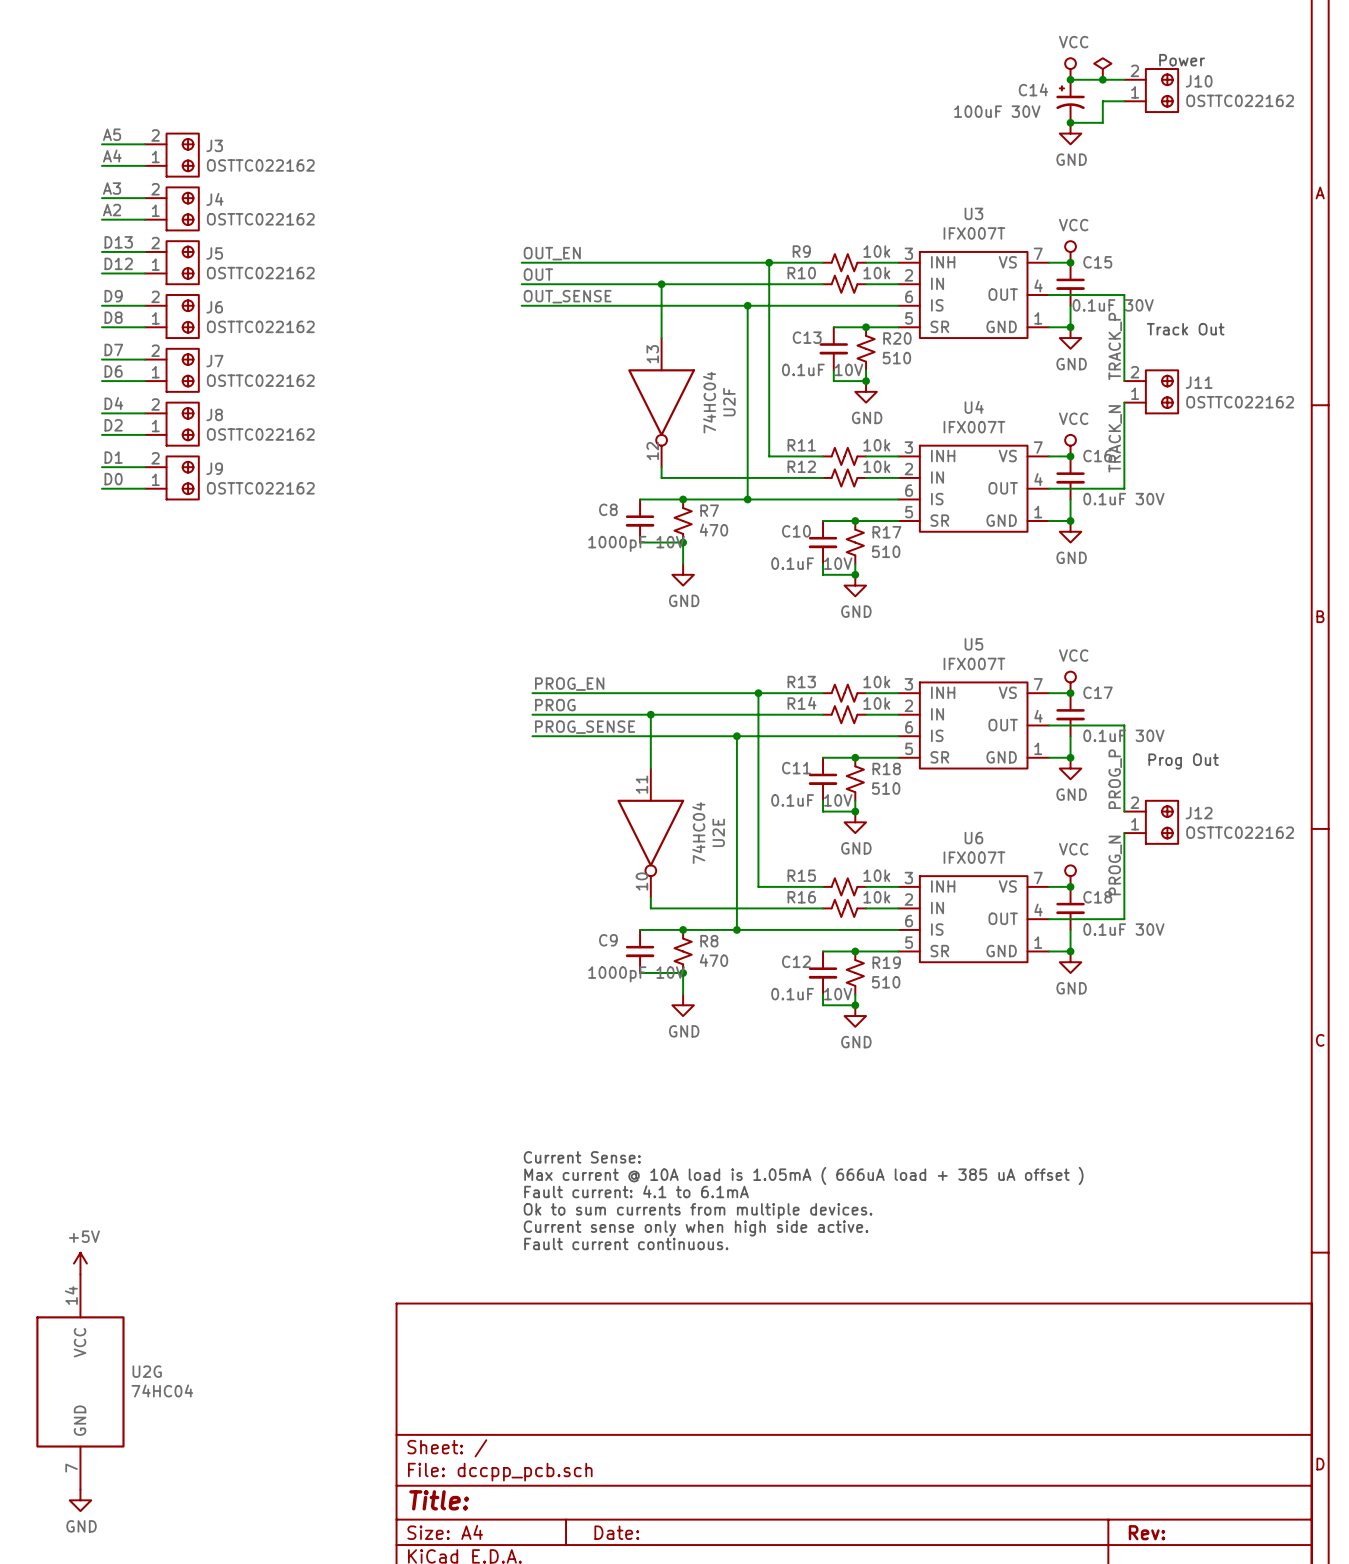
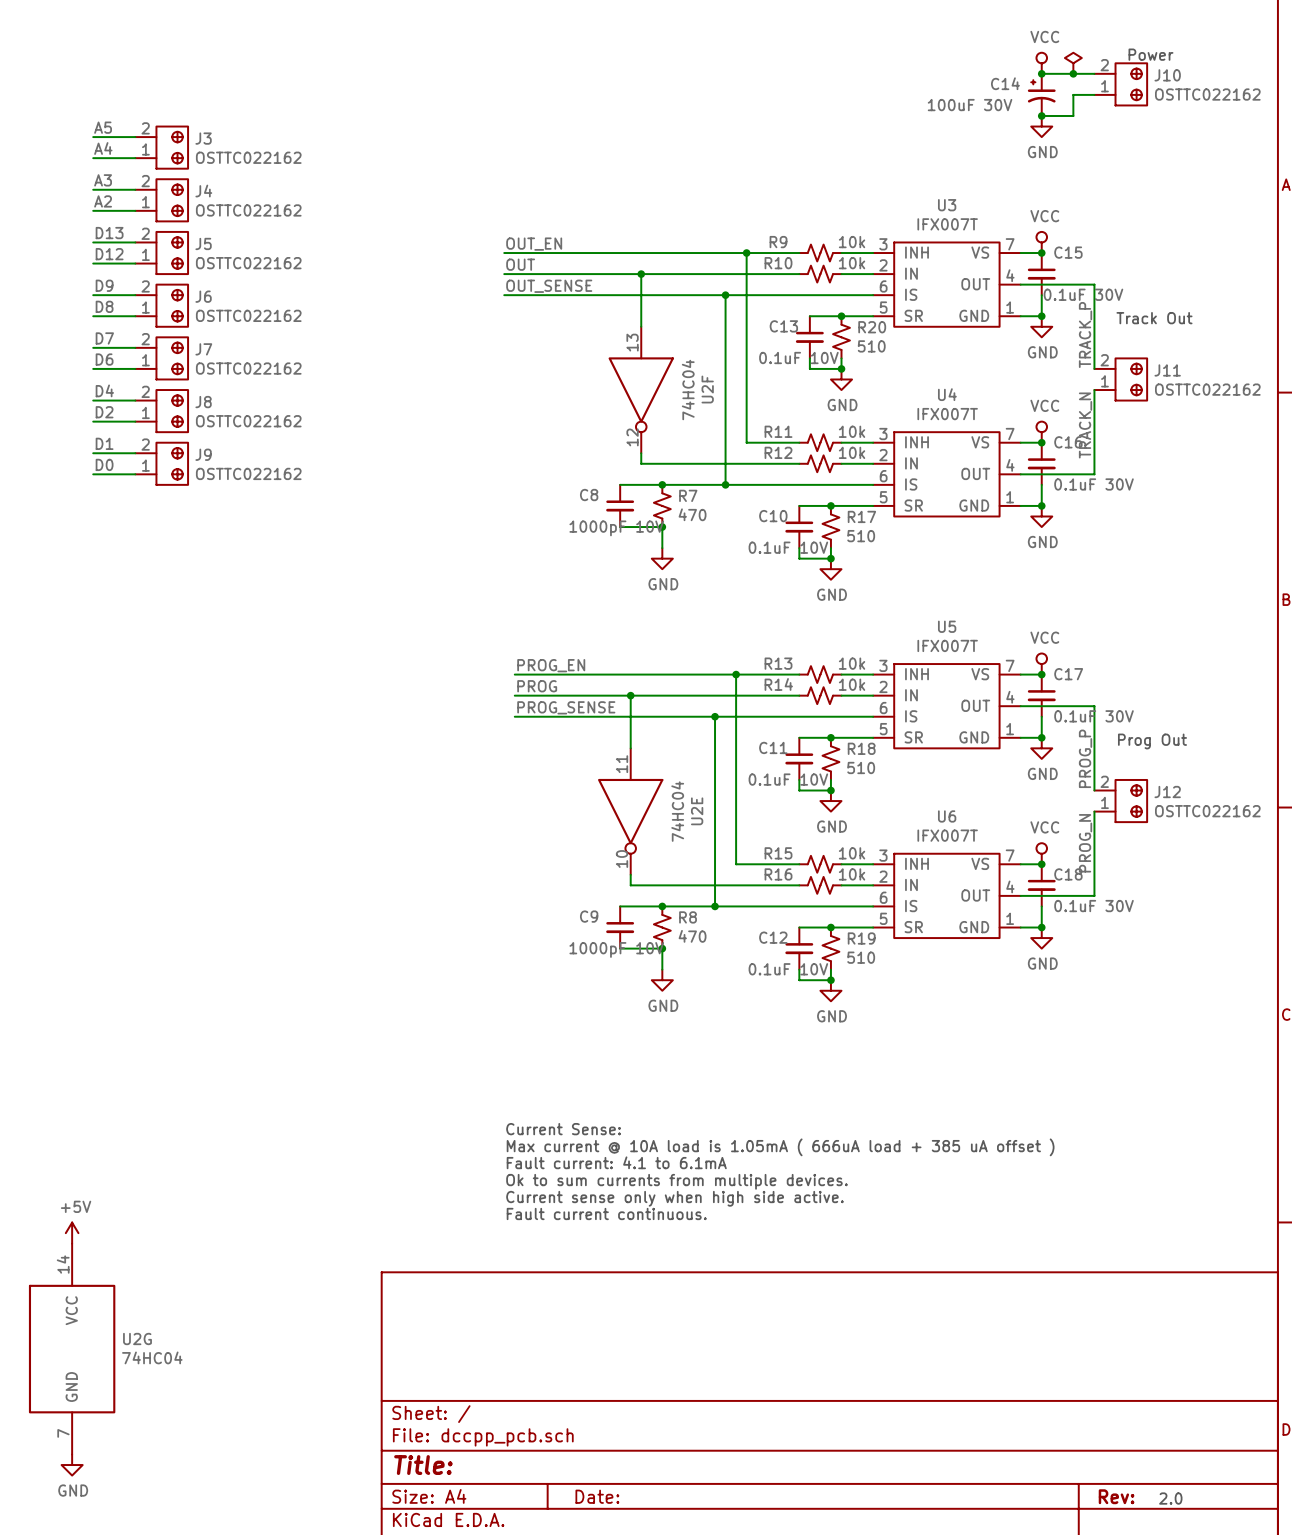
text: none -> 2.0 (1170, 1498)

